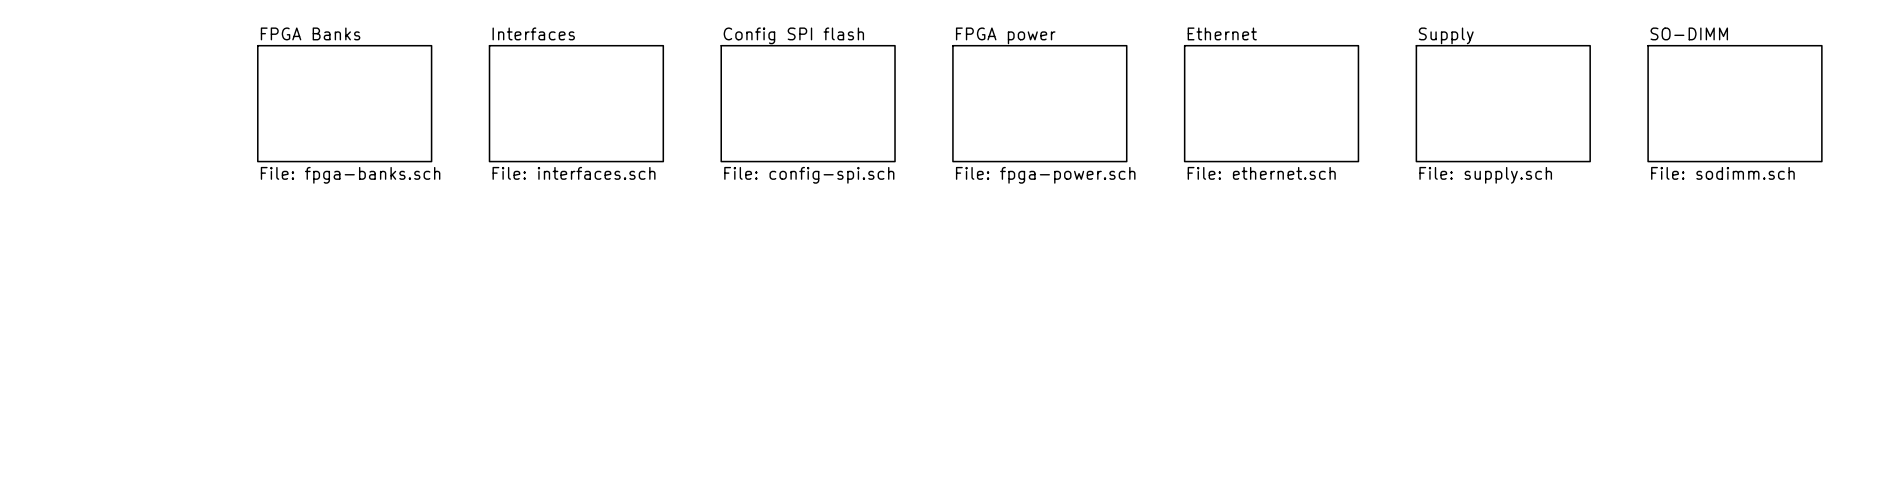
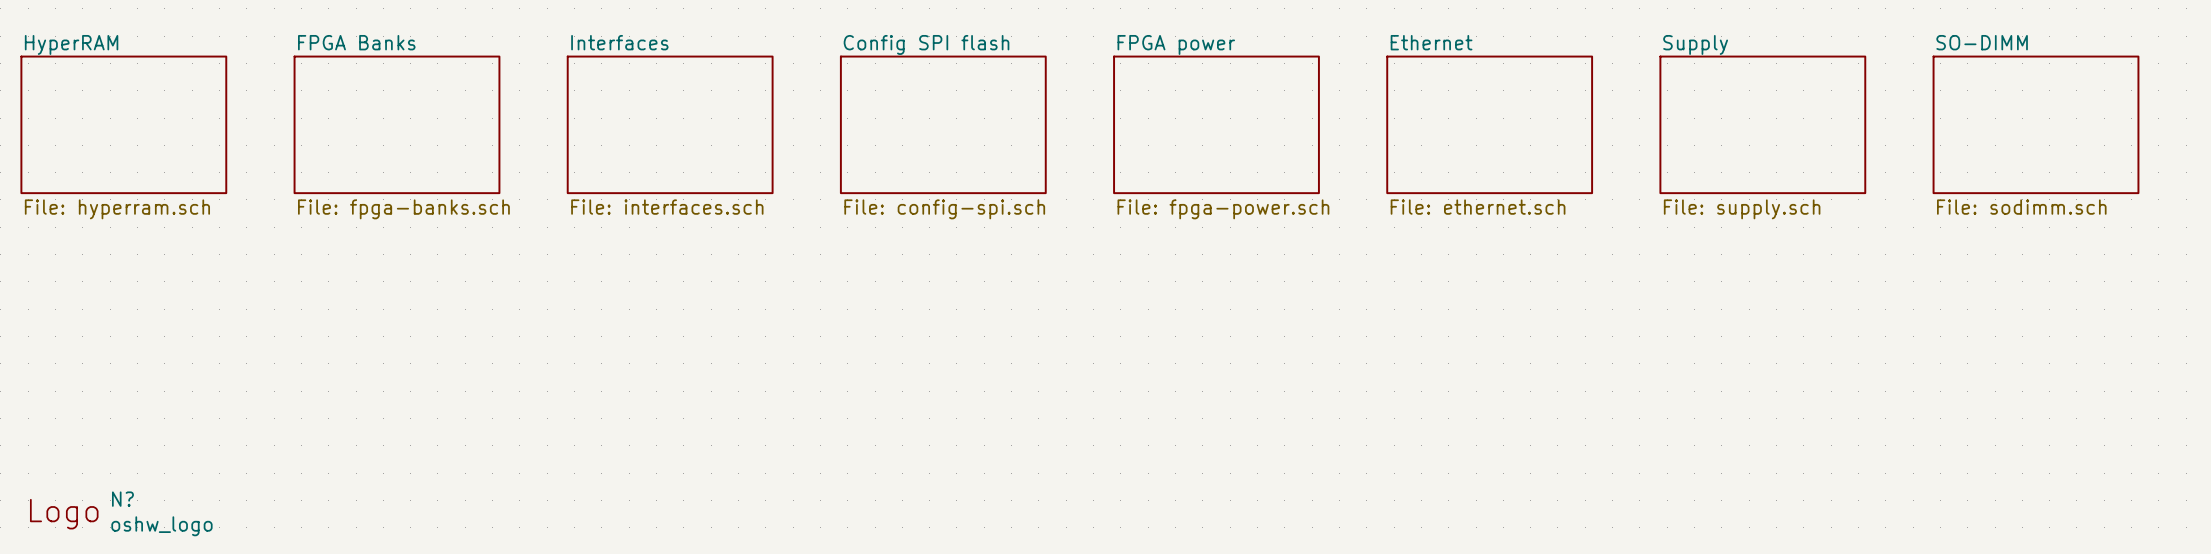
sheet HyperRAM: none -> File: hyperram.sch (123, 124)
N?: none -> oshw_logo (121, 513)

